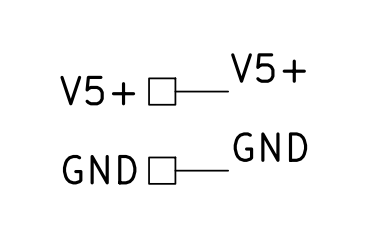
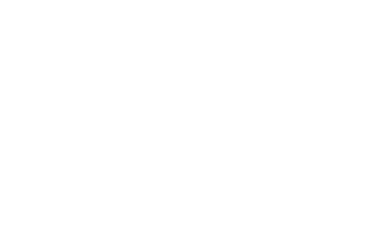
label: V5+ (268, 68) -> none
hierarchical label: V5+ (97, 90) -> none
wire: (175, 91) (228, 91) -> none
label: GND (270, 147) -> none
hierarchical label: GND (99, 169) -> none
wire: (175, 170) (228, 170) -> none

